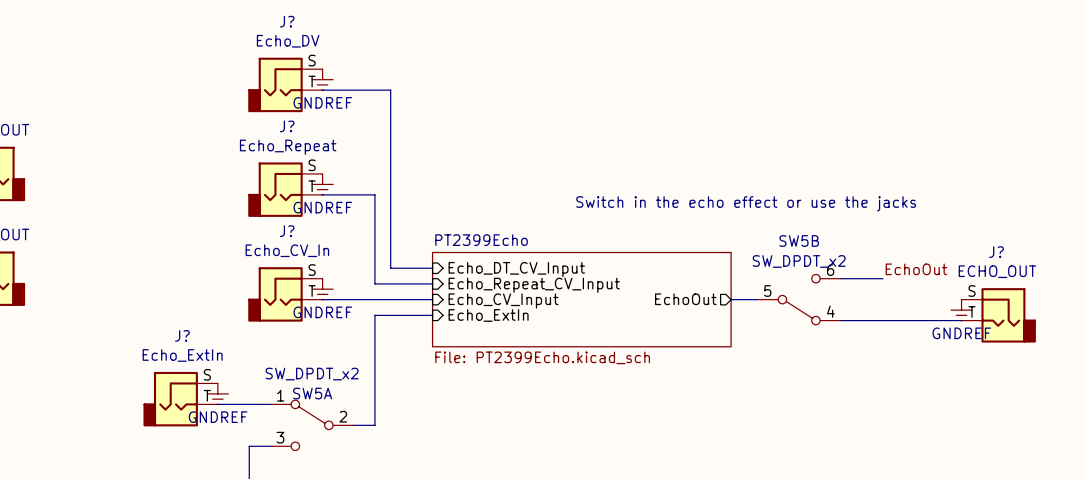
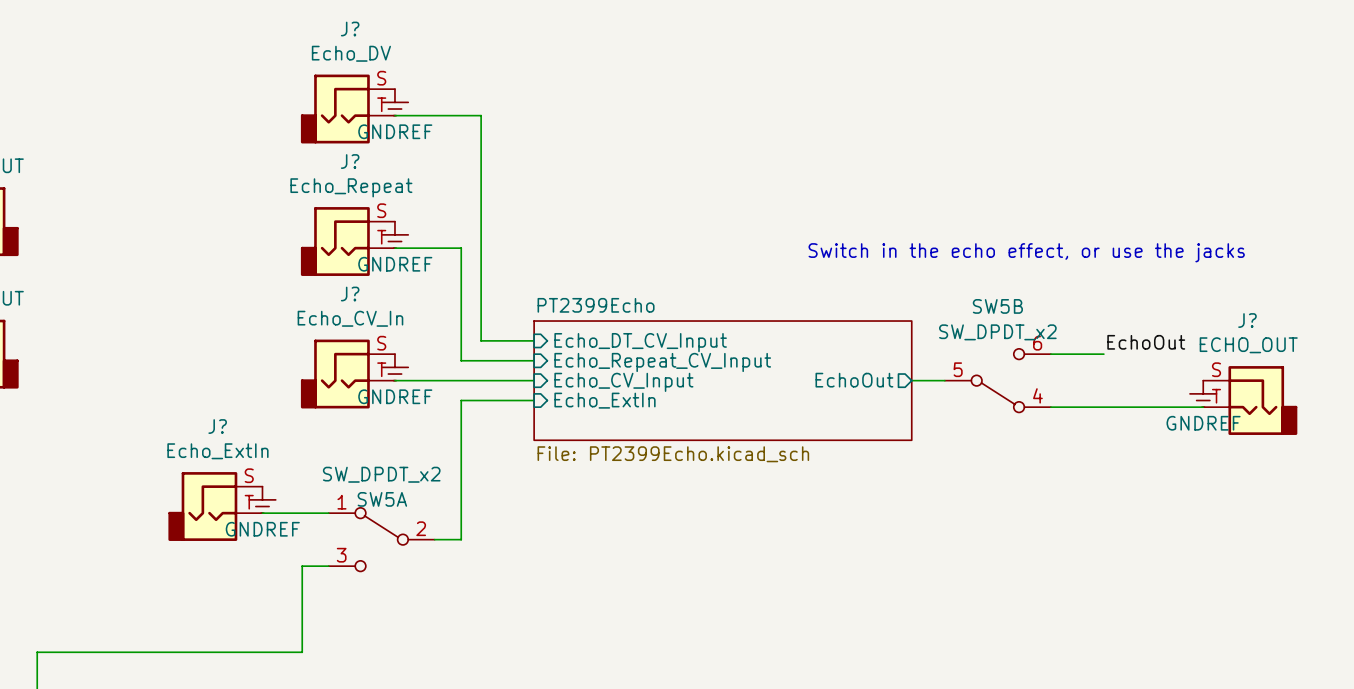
text: Switch in the echo effect or use the jacks (746, 203) -> Switch in the echo effect, or use the jacks (1026, 252)

